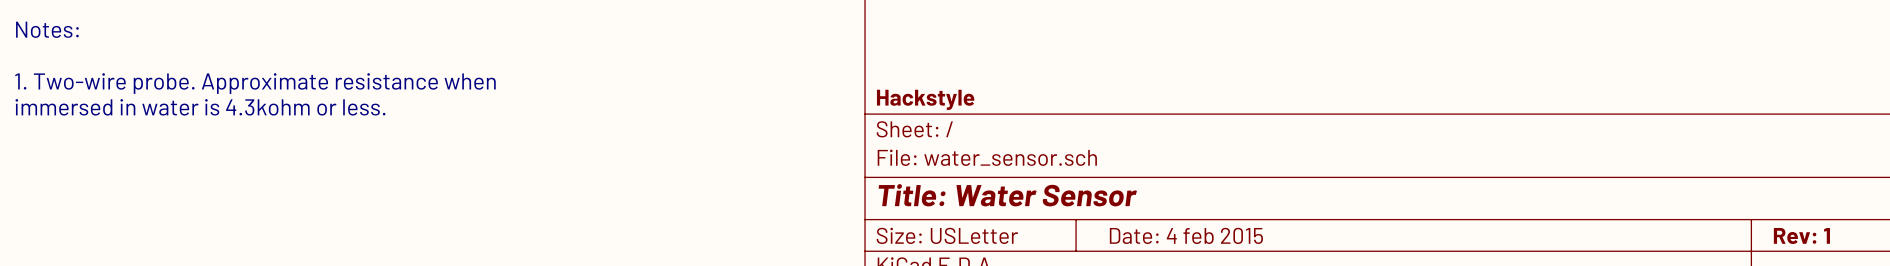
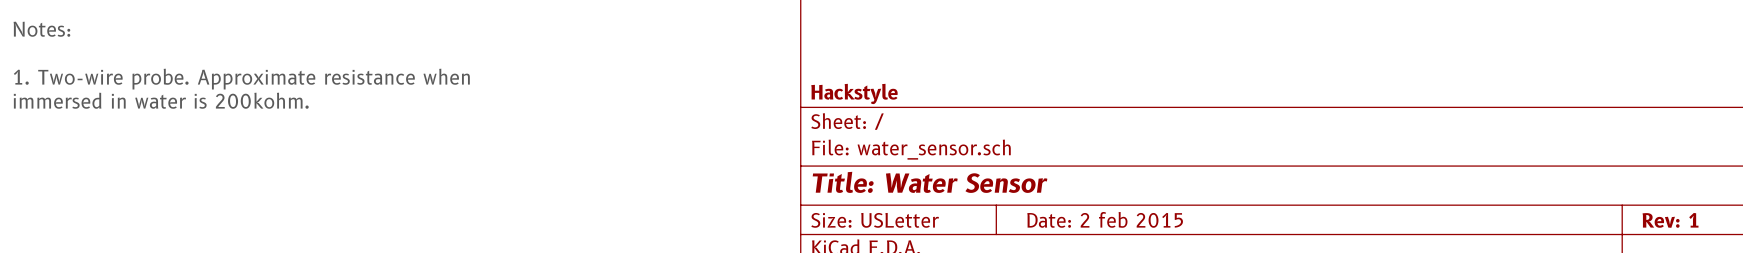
text: immersed in water is 4.3kohm or less. (200, 107) -> immersed in water is 200kohm. (161, 100)
title block: Date: 4 feb 2015 (1186, 235) -> Date: 2 feb 2015 (1105, 219)

